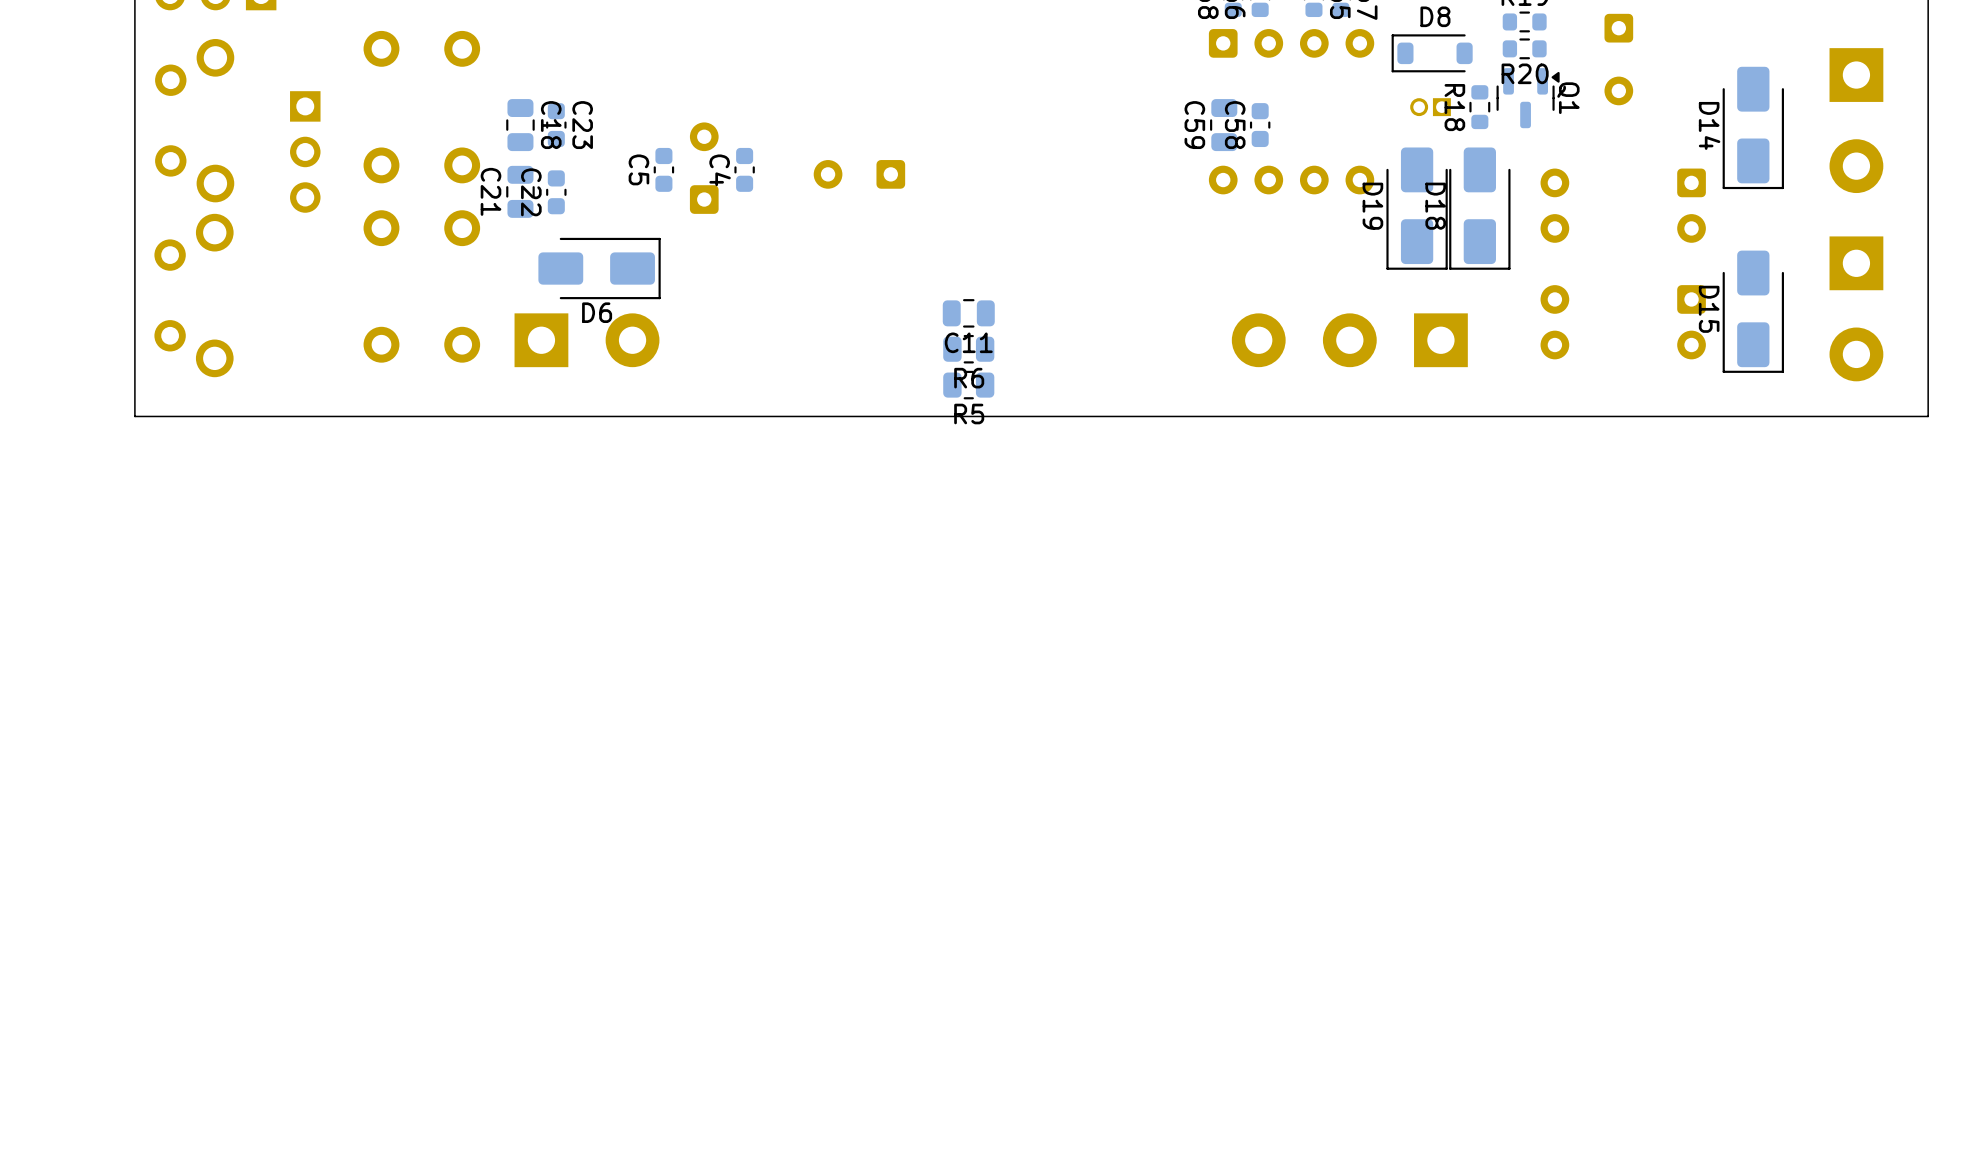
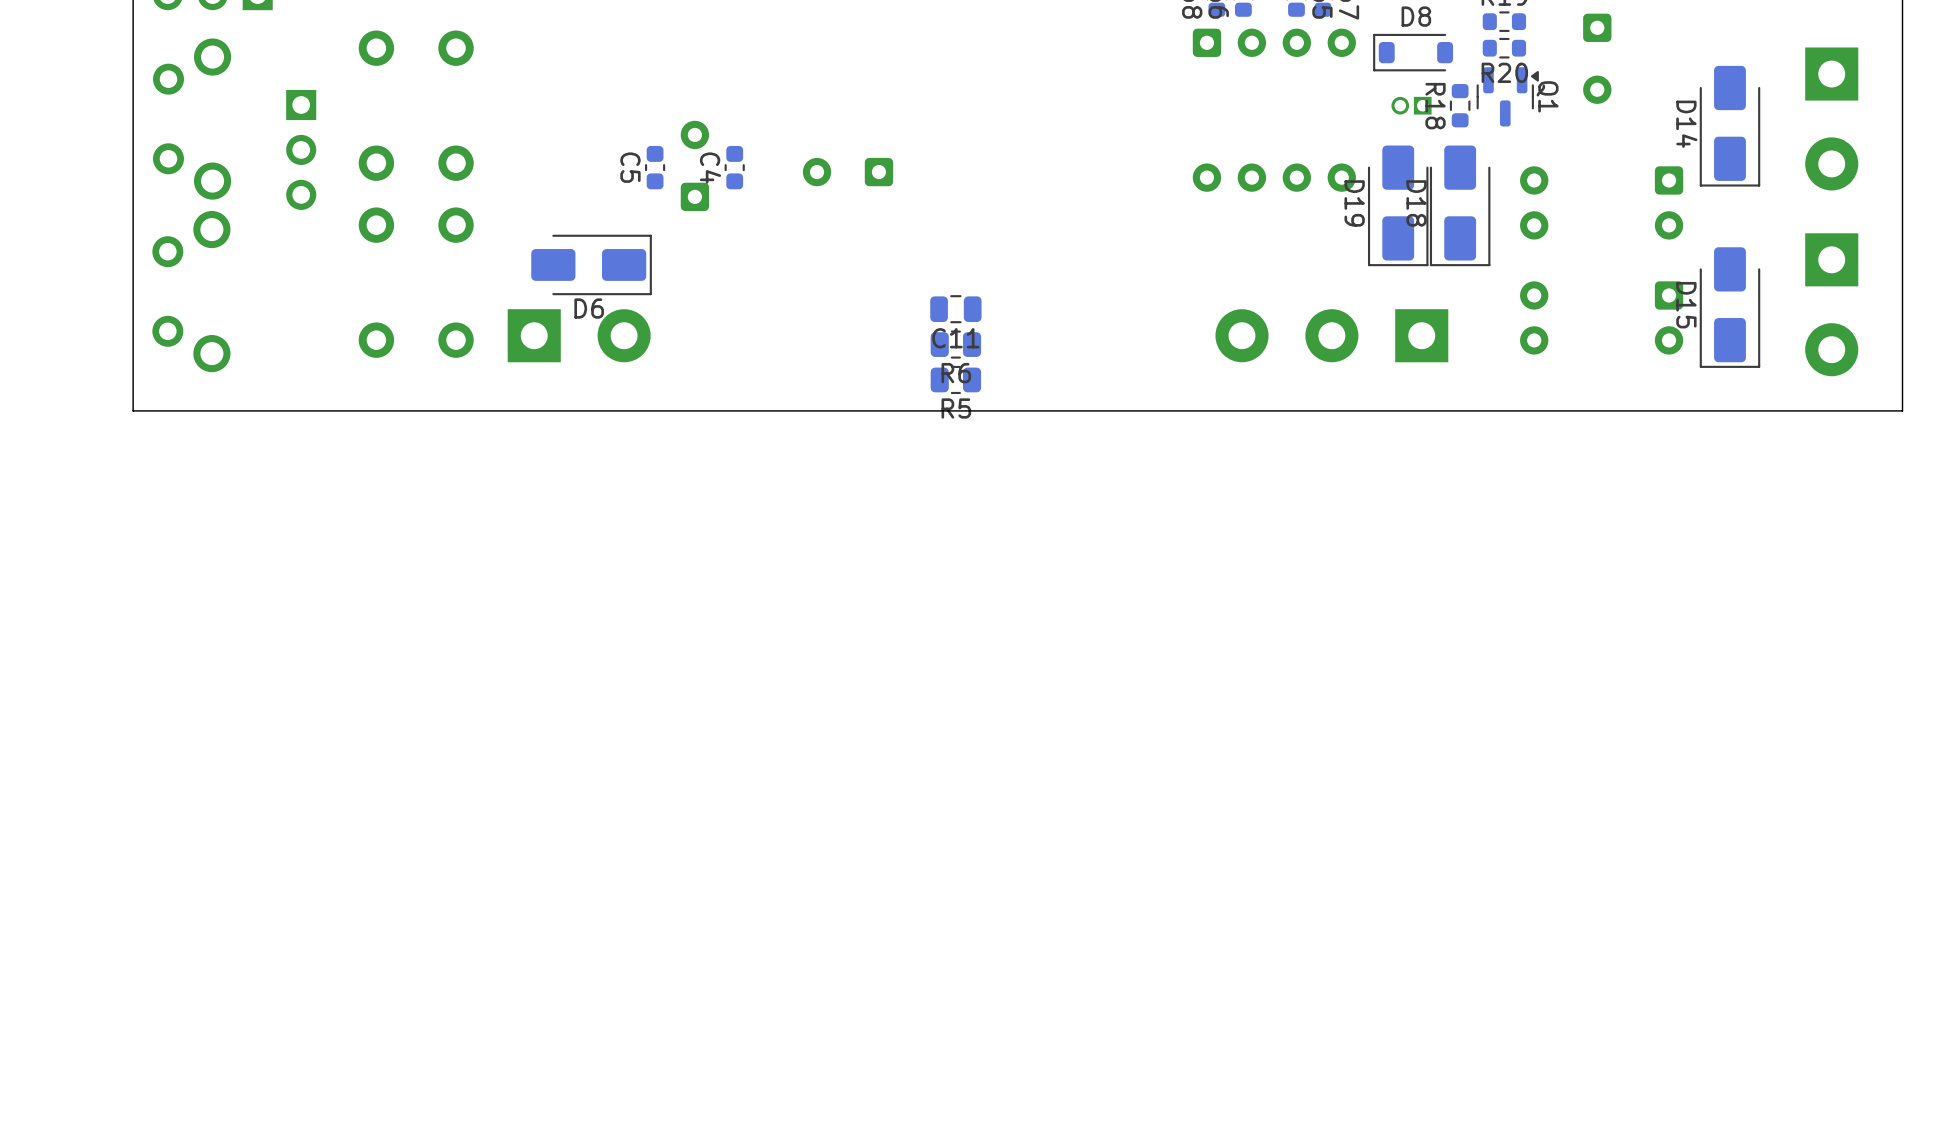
C18: (520, 125) -> none
C23: (556, 125) -> none
C59: (1224, 125) -> none
C58: (1260, 125) -> none
C21: (520, 191) -> none
C22: (556, 192) -> none

